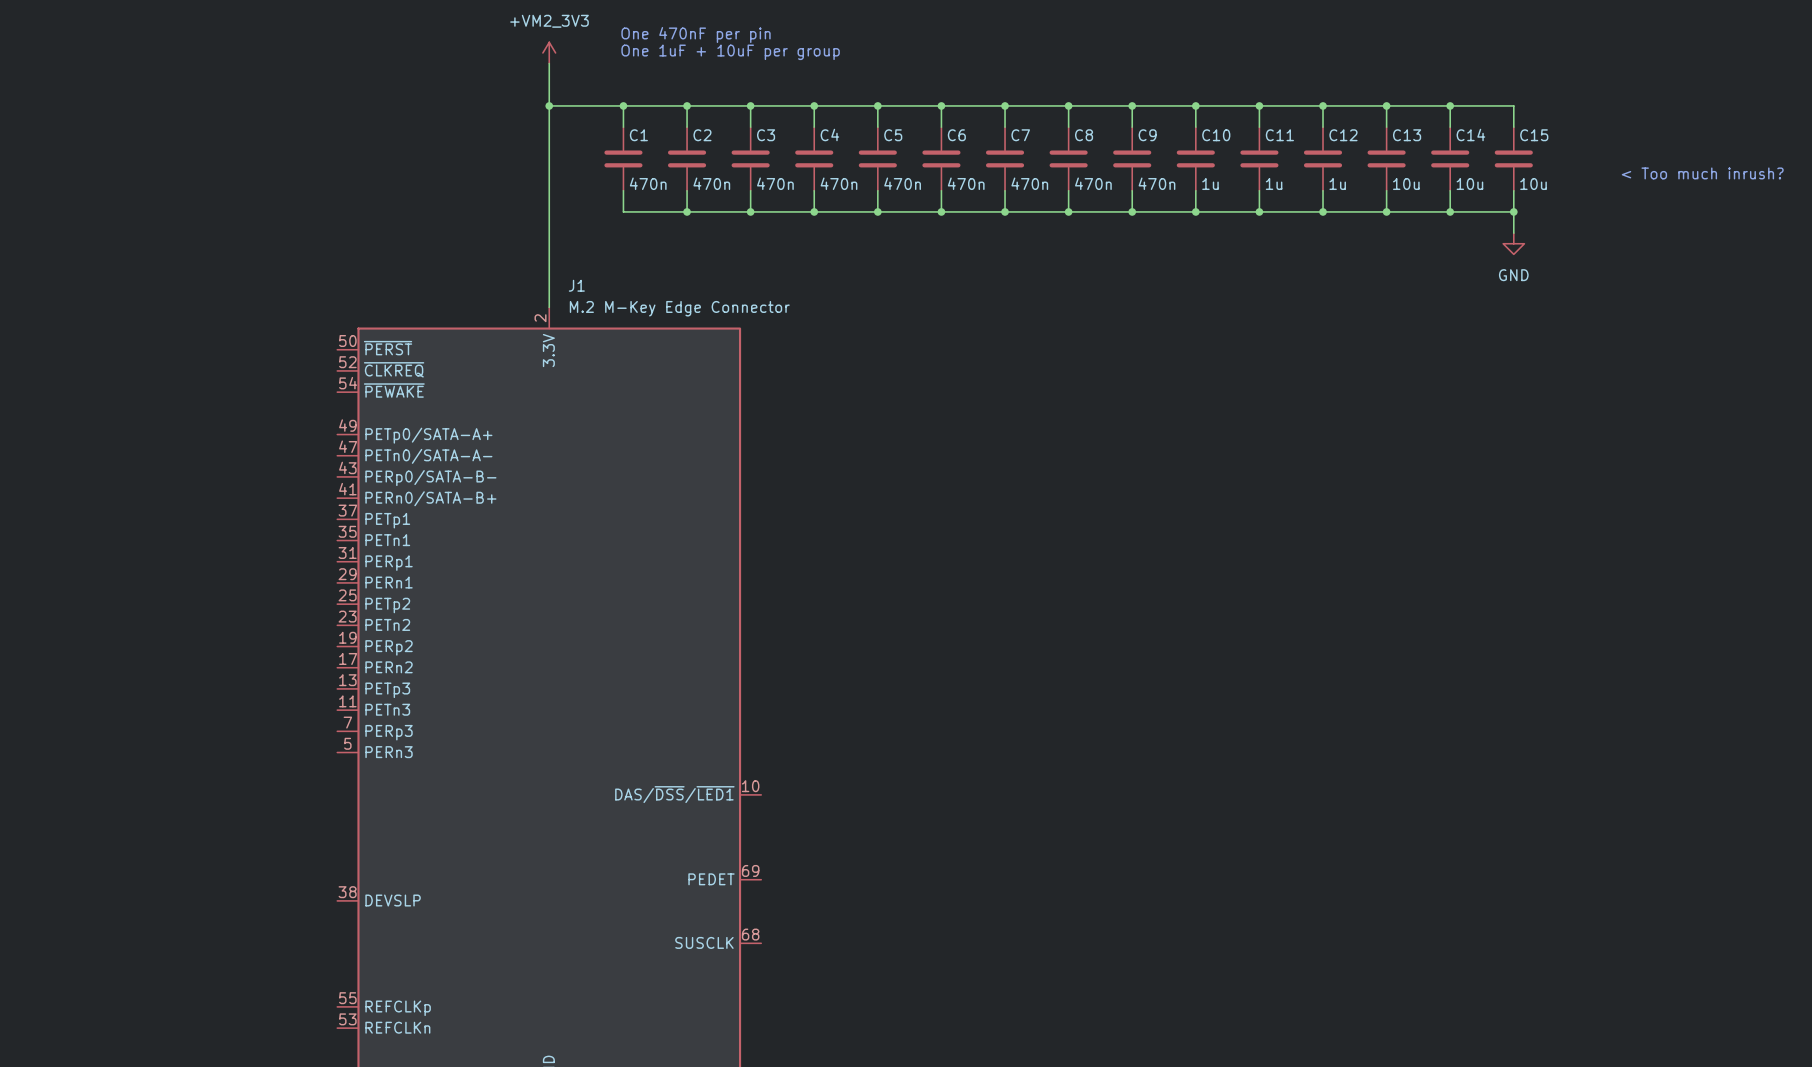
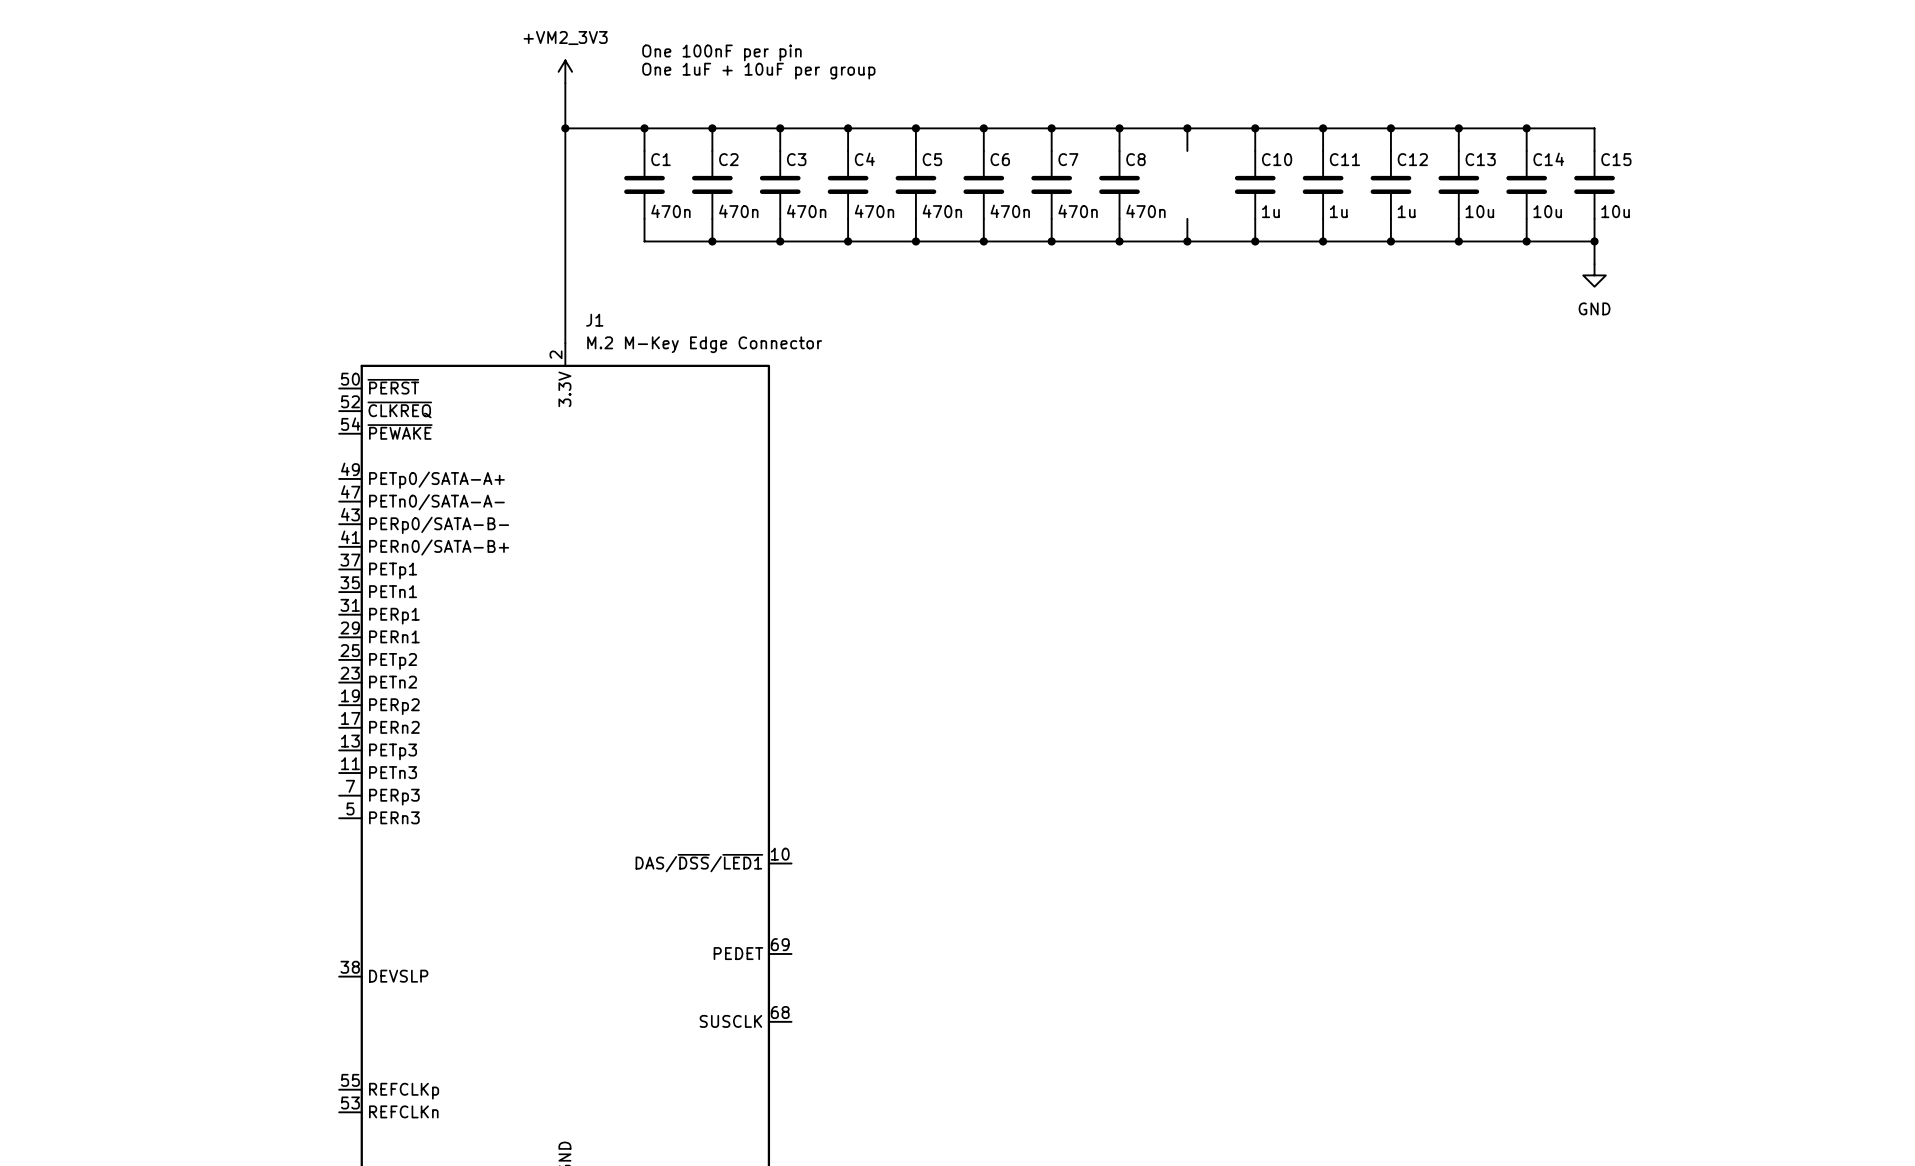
text: One 470nF per pin (696, 34) -> One 100nF per pin (721, 52)
C9: 470n (1132, 158) -> none
text: < Too much inrush? (1702, 173) -> none

